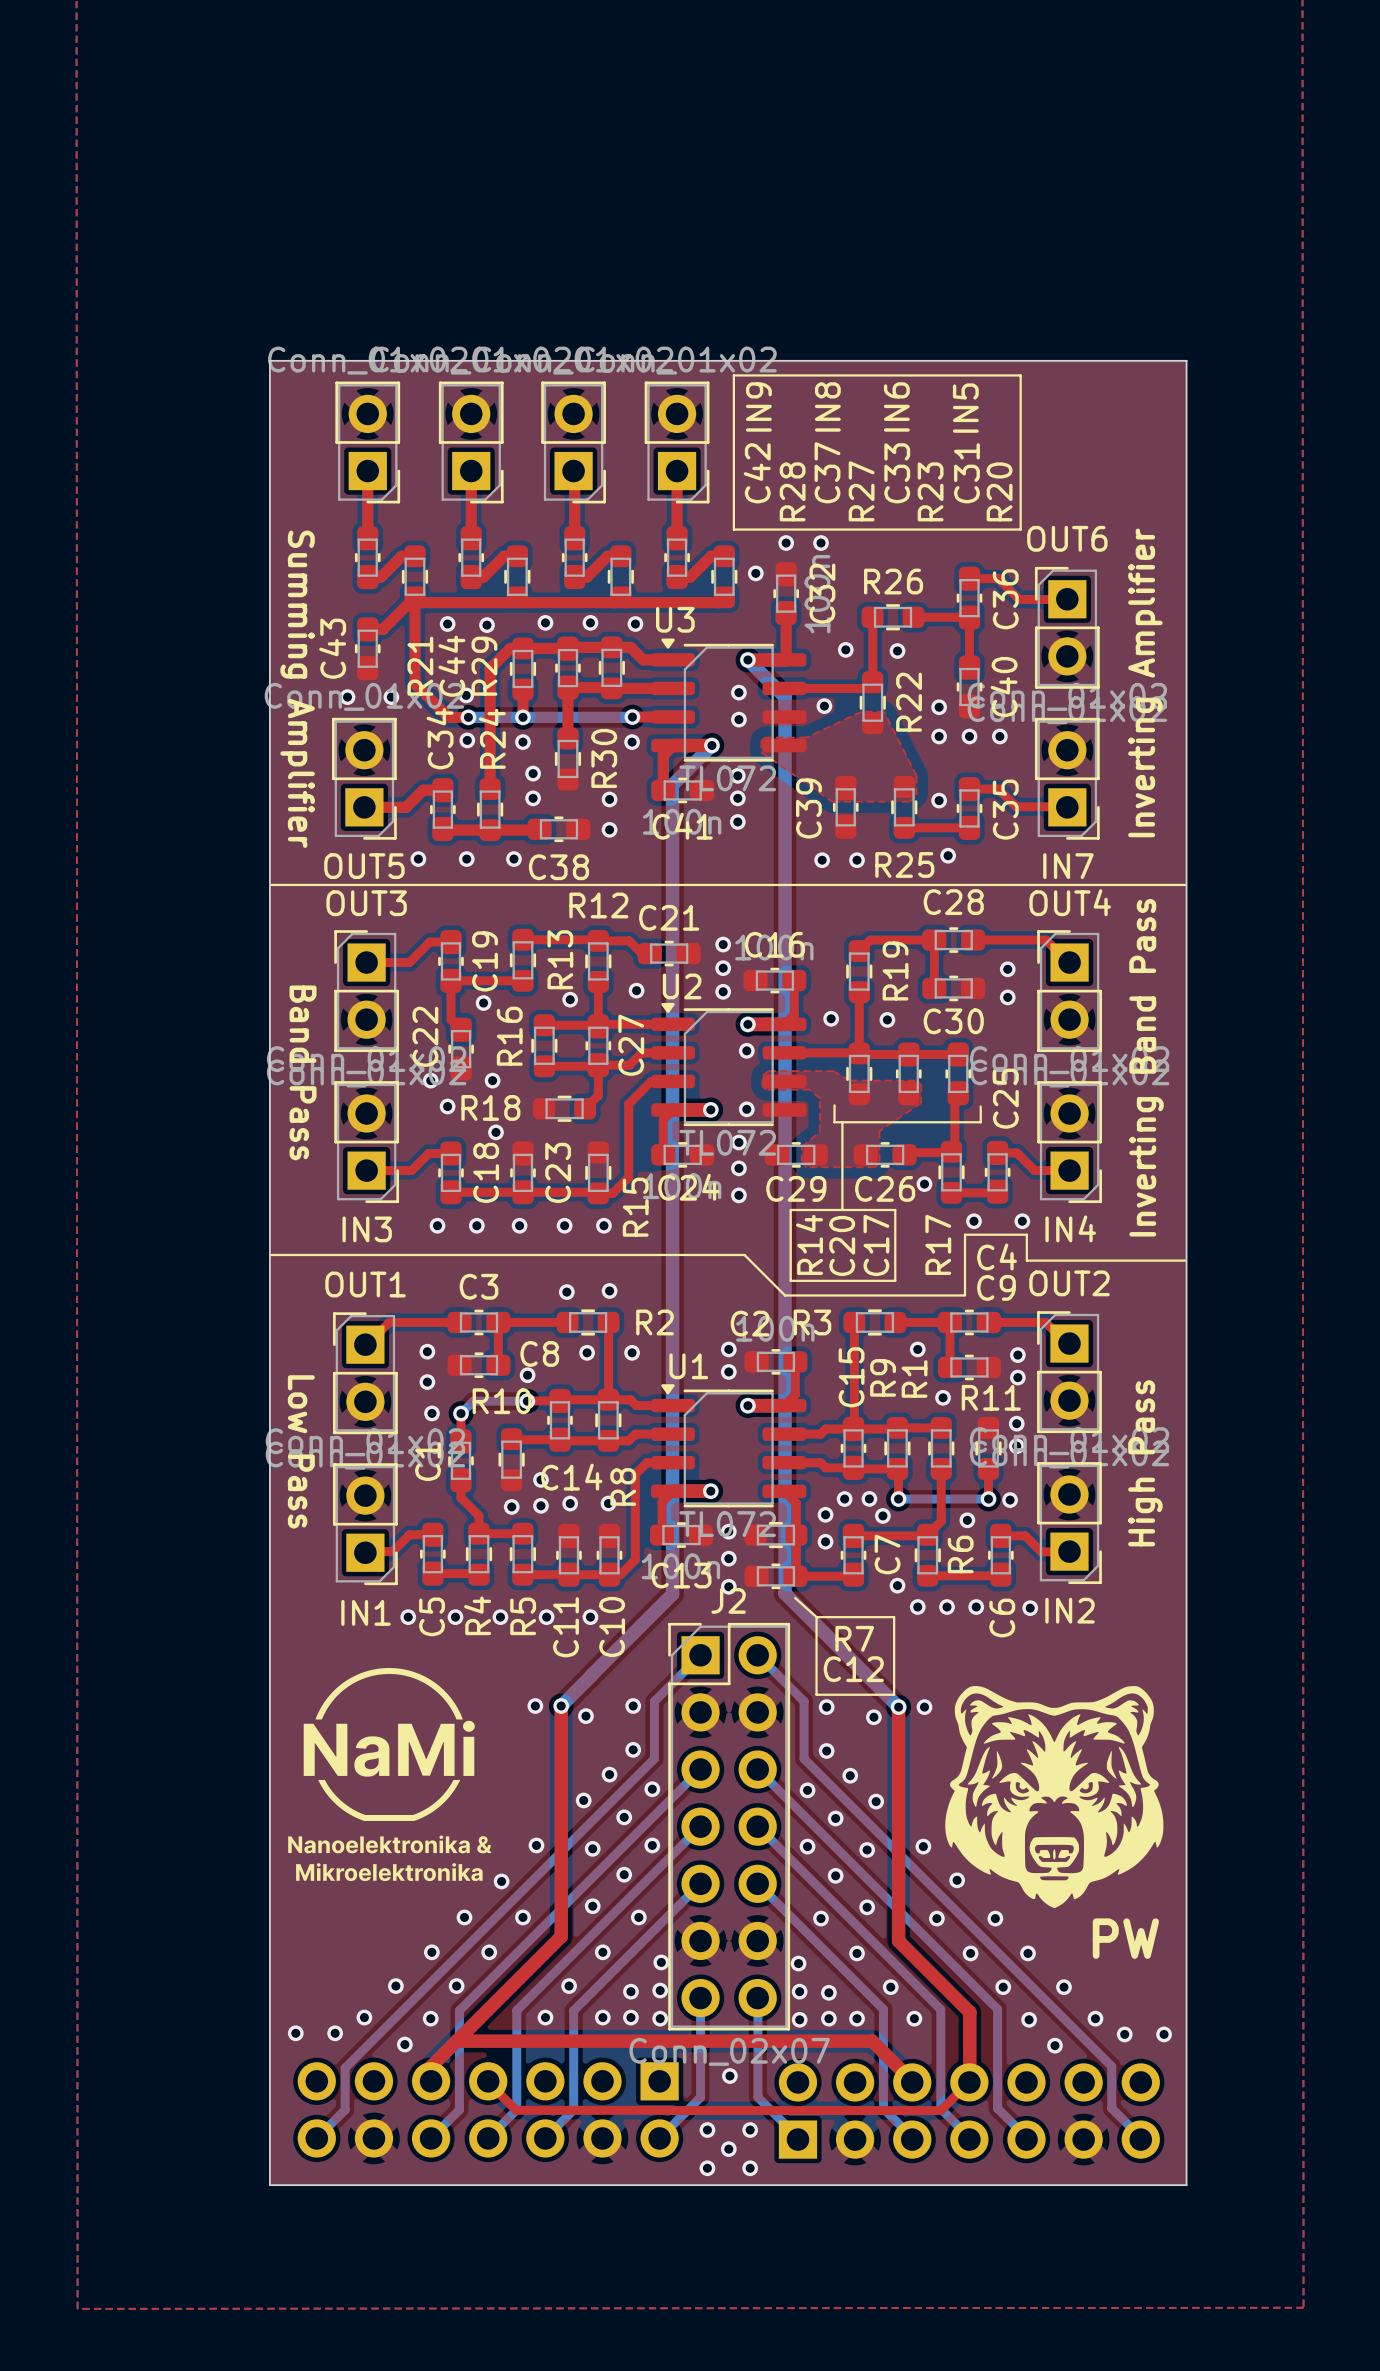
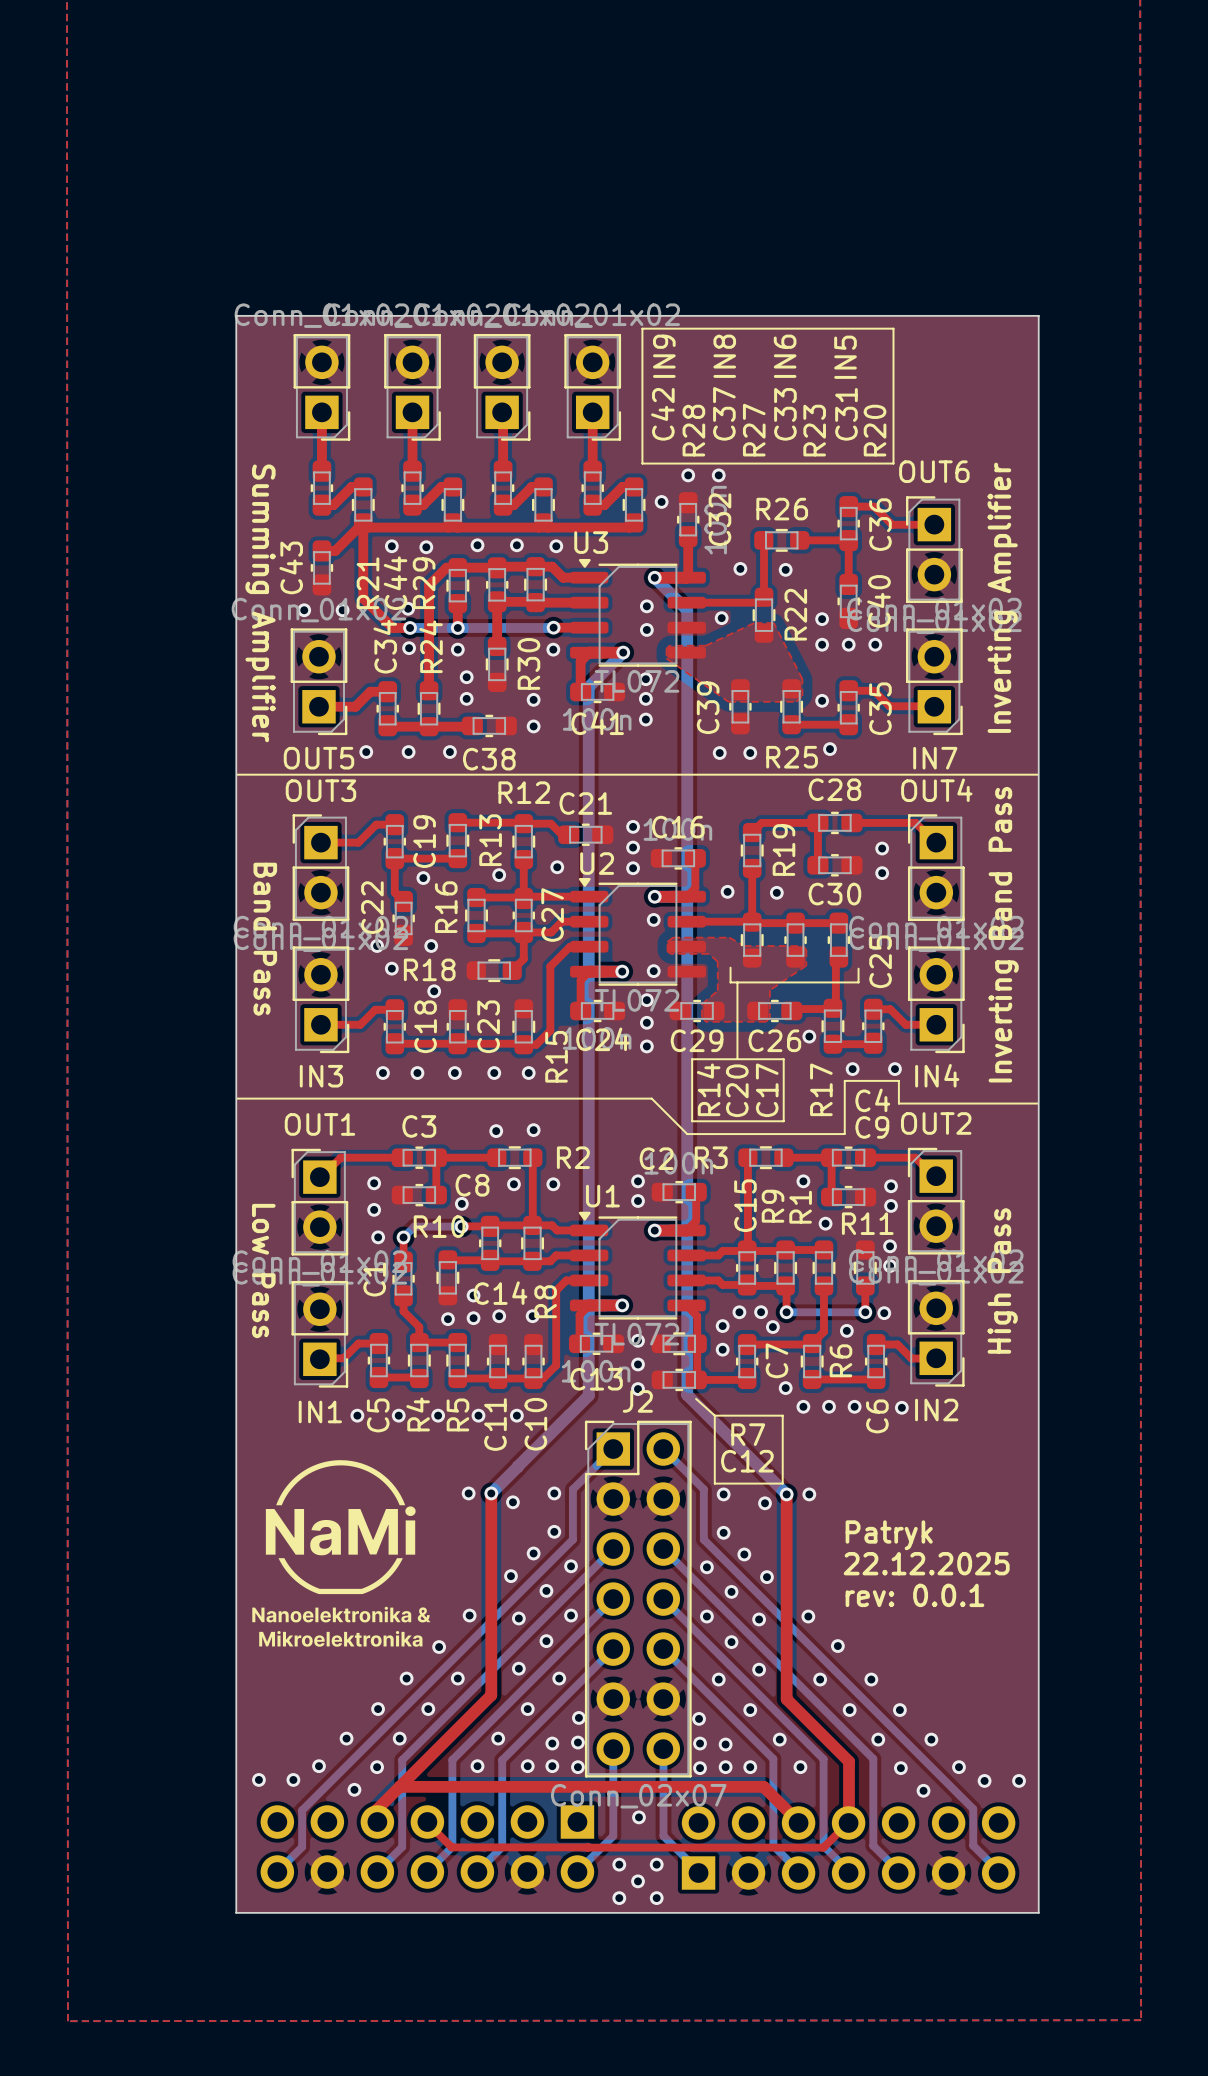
drawing: [945, 1685, 1164, 1909] -> none
text: none -> Patryk (889, 1535)
text: none -> 22.12.2025 (926, 1563)
text: none -> rev: 0.0.1 (914, 1595)
text: PW (1125, 1938) -> none

